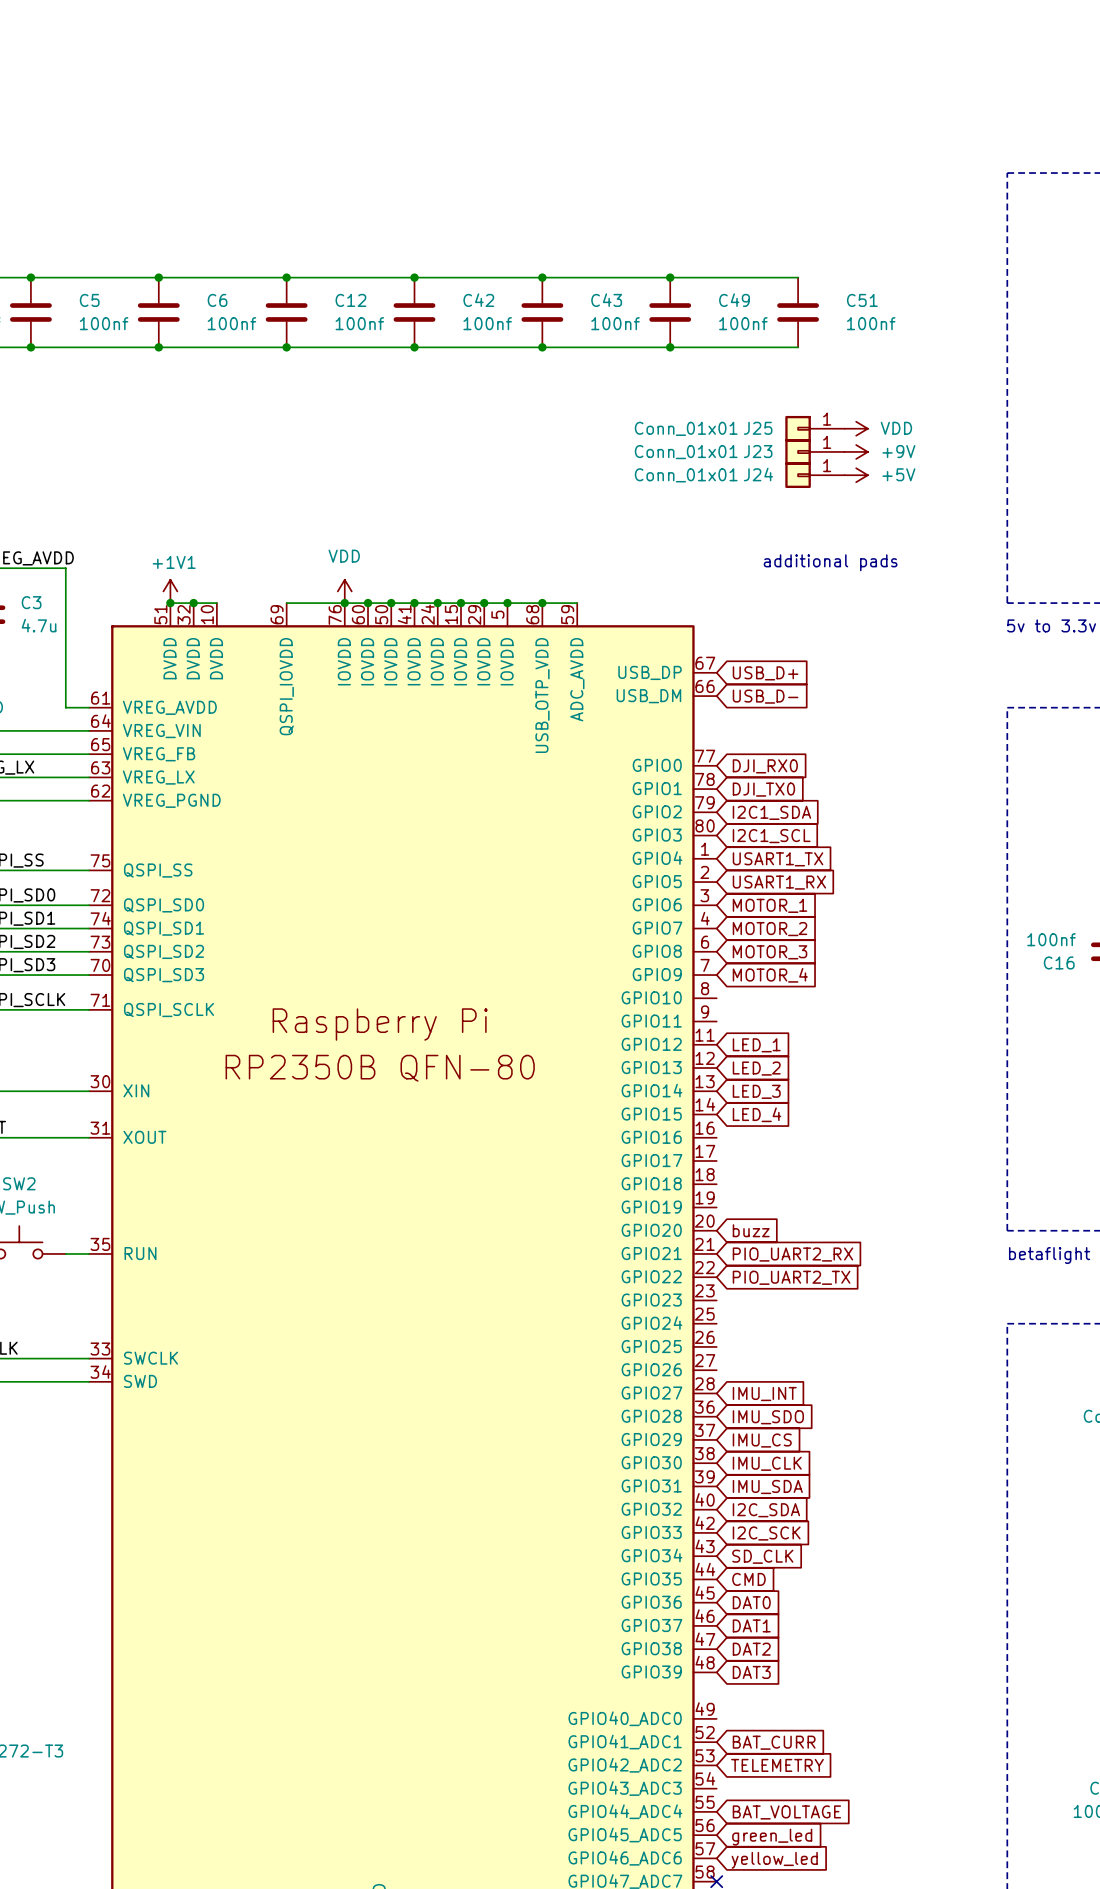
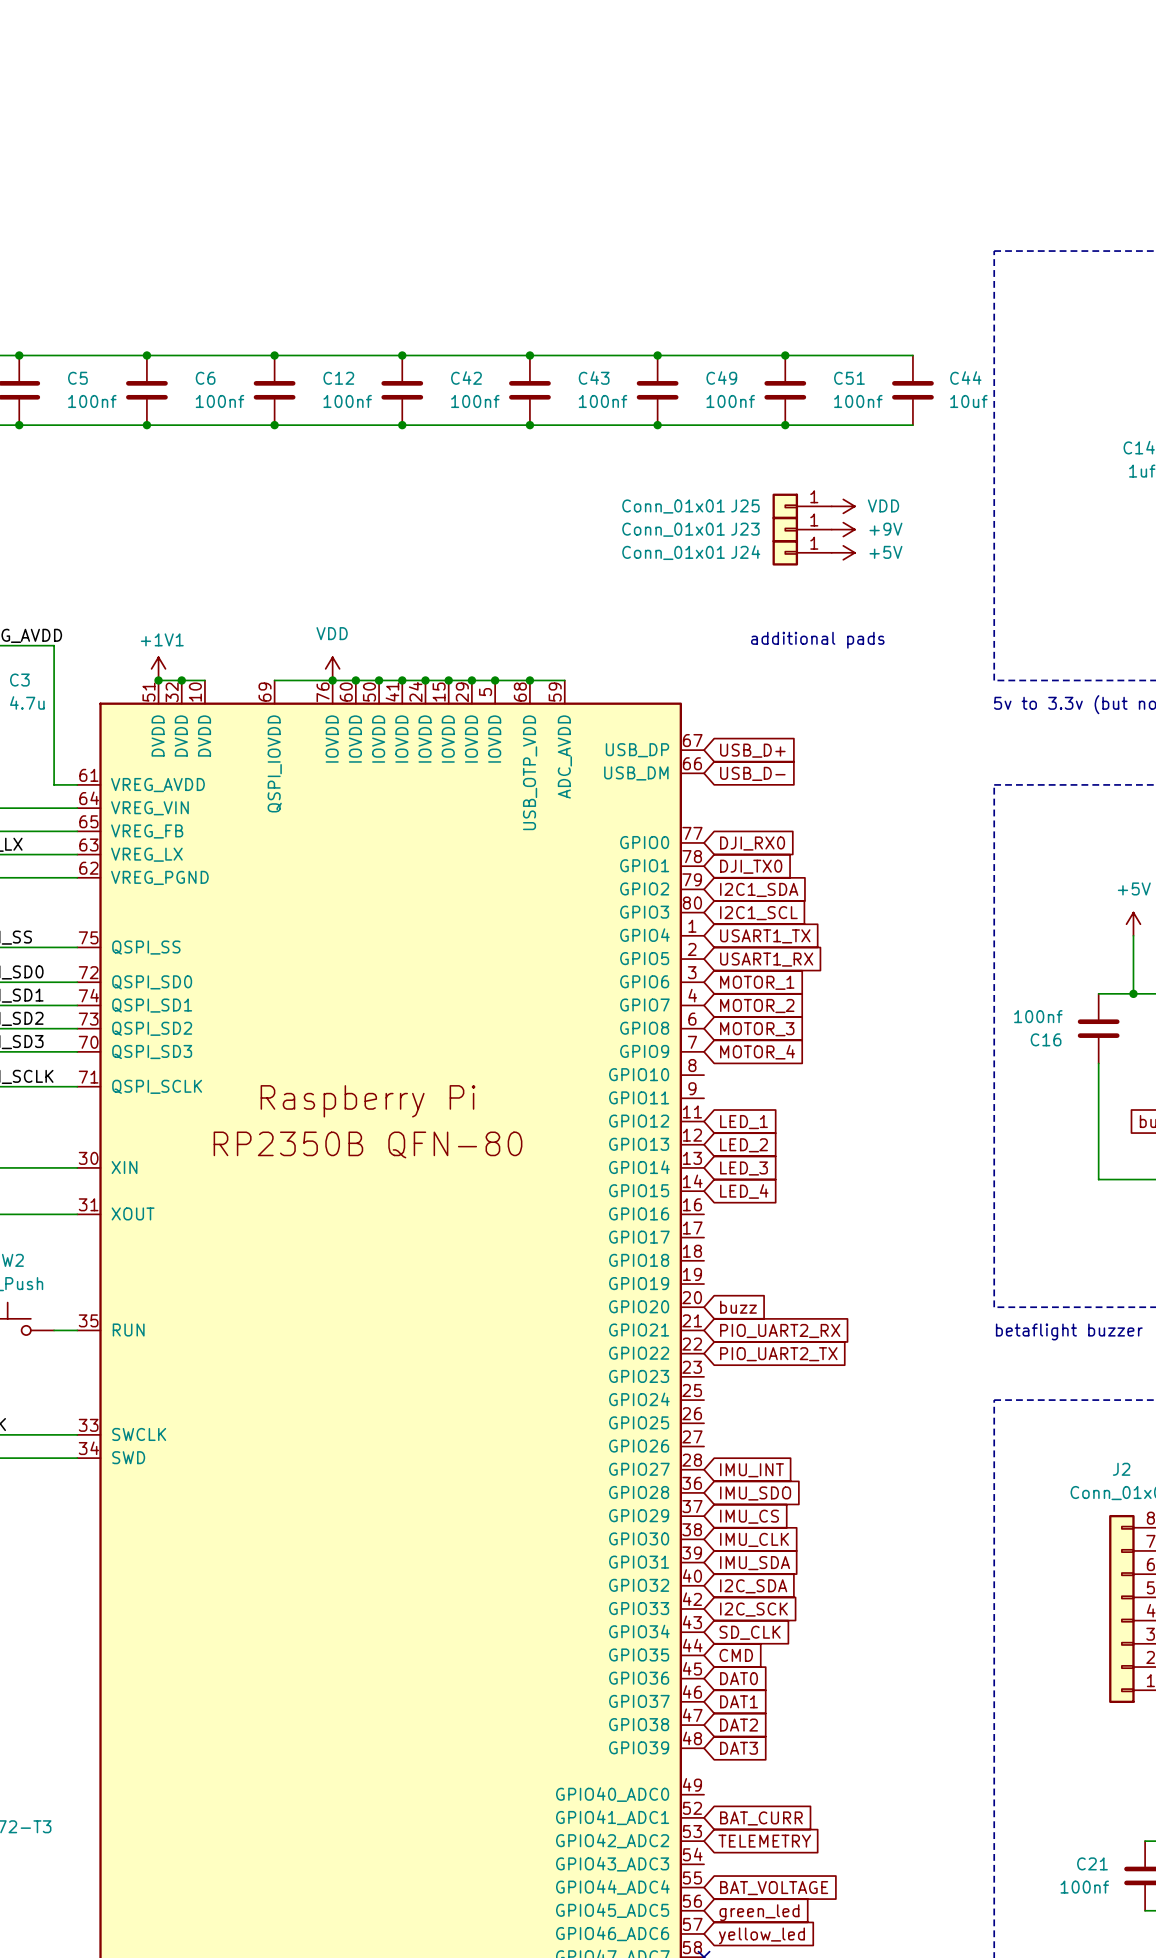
wire: none -> (785, 355) (912, 355)
junction: none -> (785, 355)
C44: none -> 10uf (912, 390)
wire: none -> (785, 425) (912, 425)
junction: none -> (785, 425)

